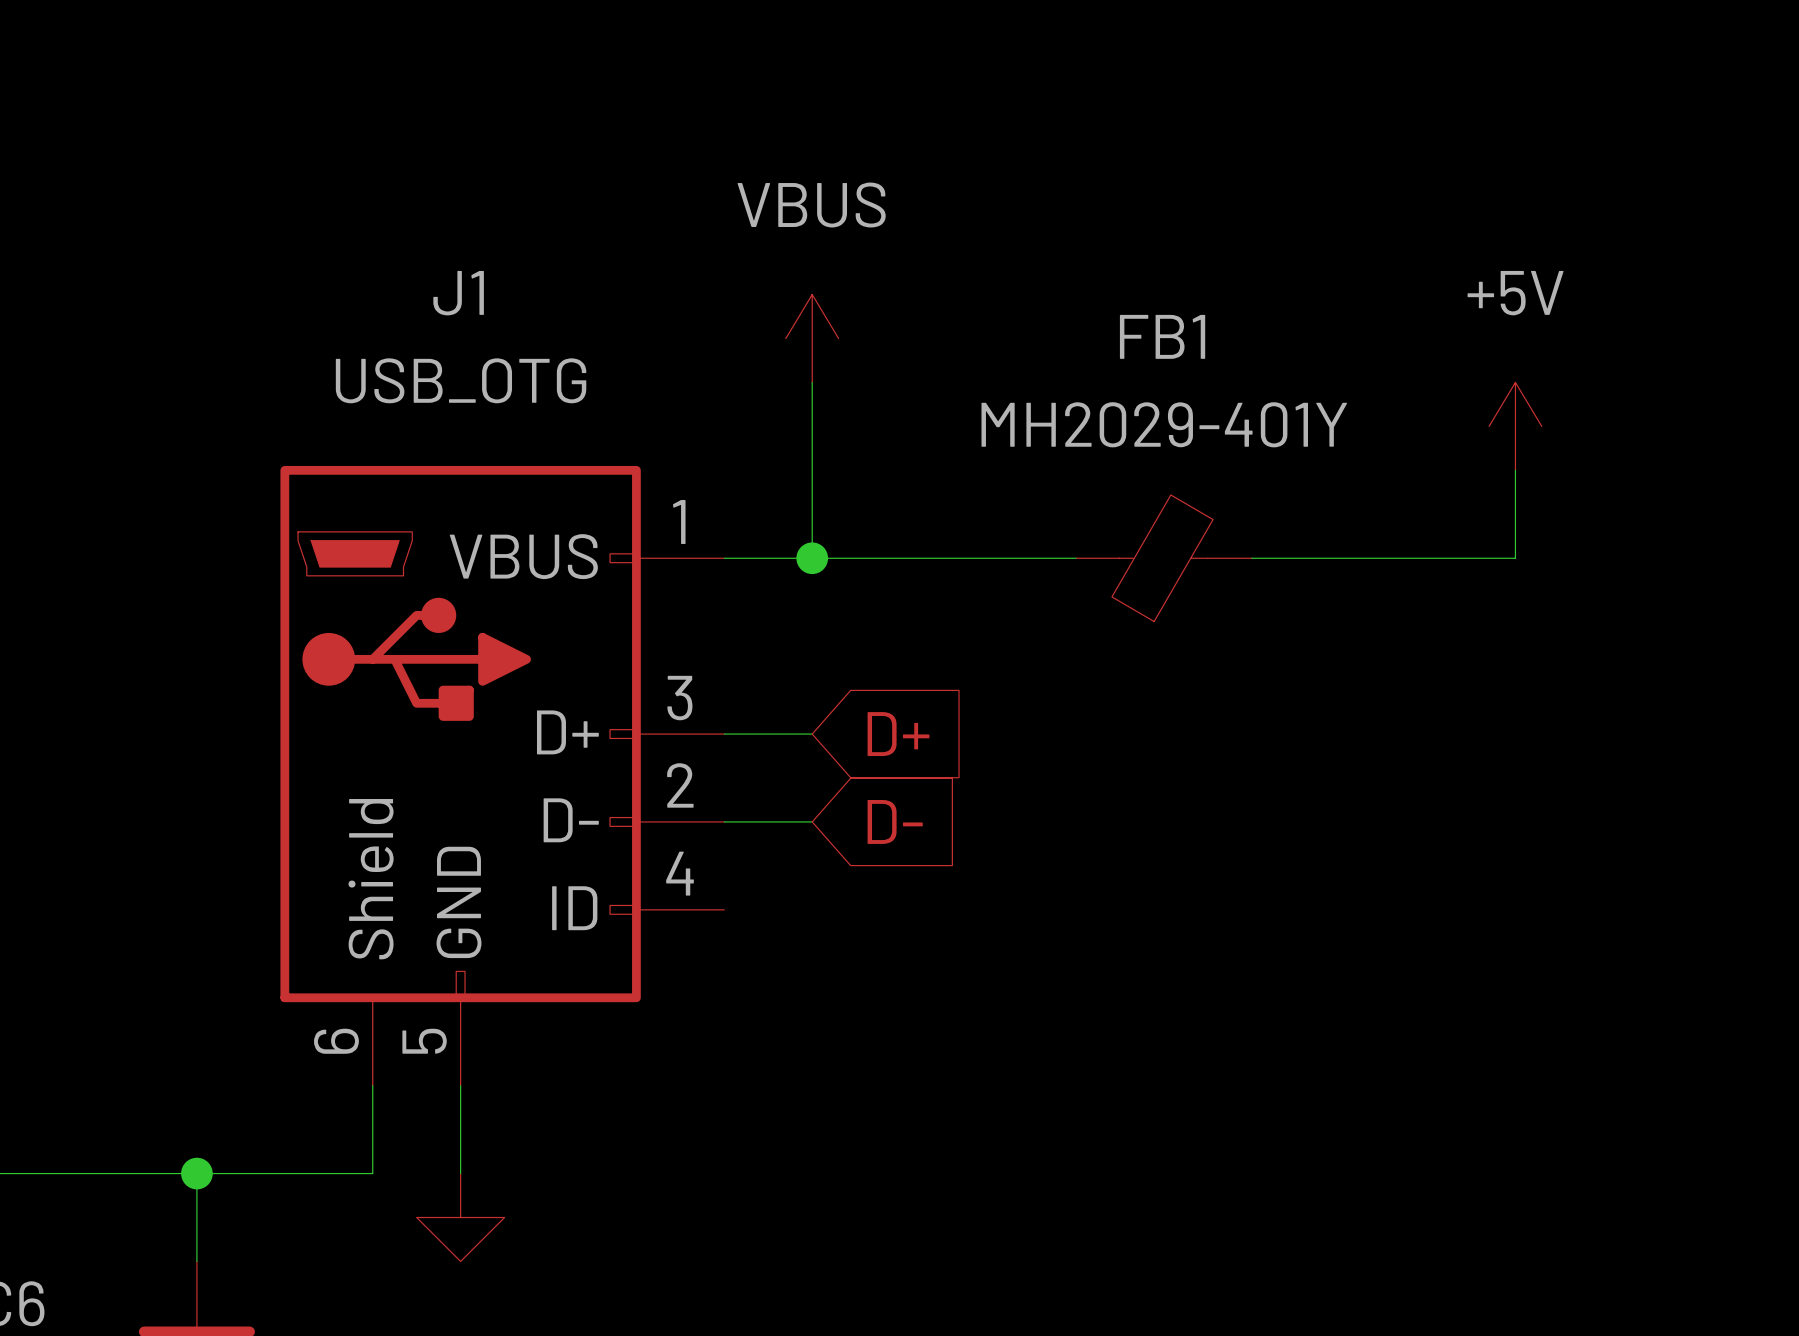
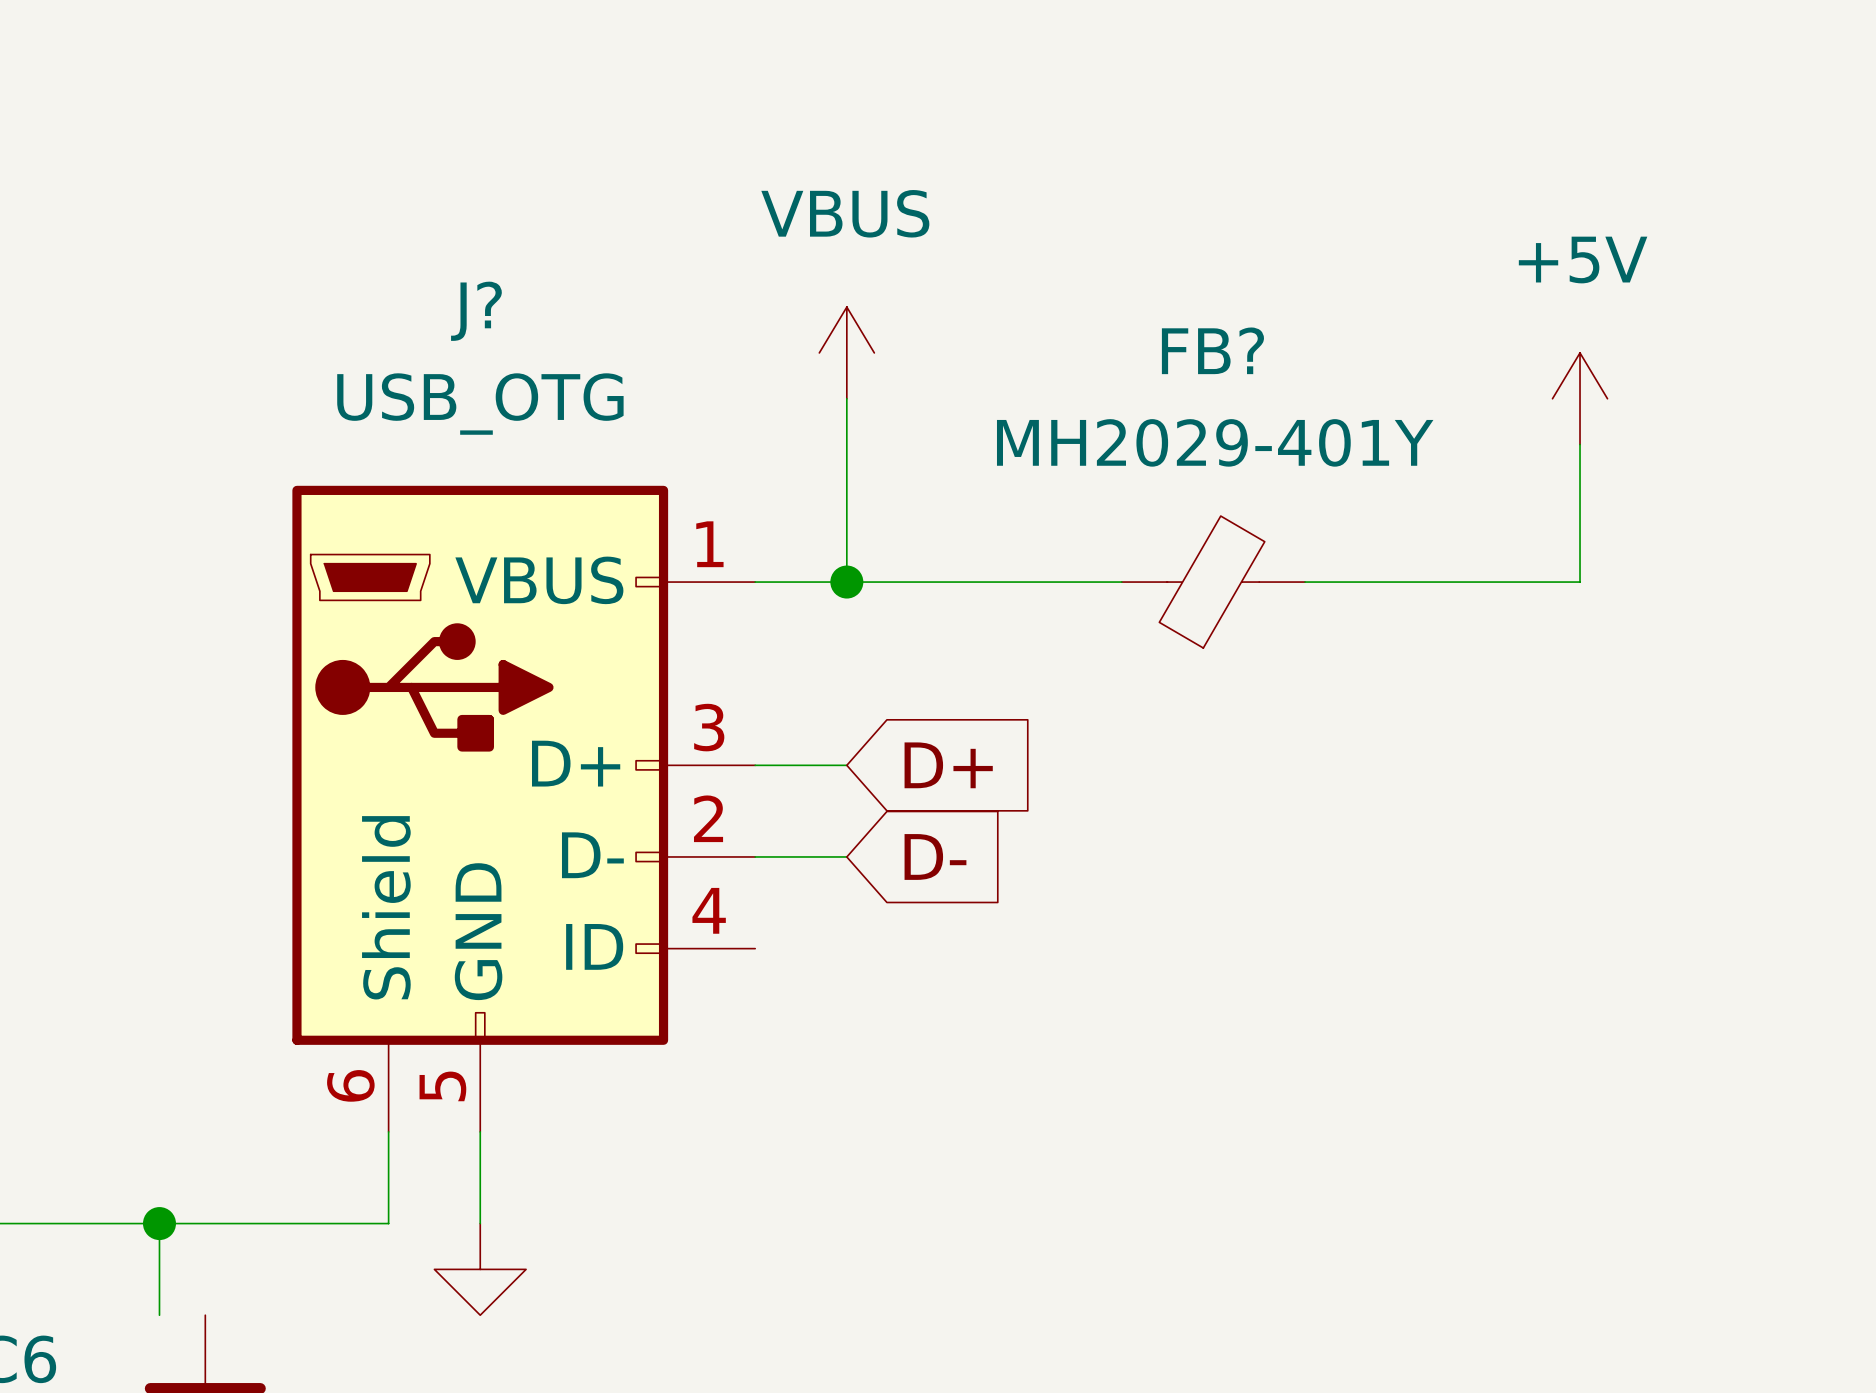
J1 name: J1 (458, 293) -> J? (476, 311)
FB1 name: FB1 (1162, 336) -> FB? (1212, 350)
power symbol position: +5V (1515, 426) -> +5V (1580, 398)
wire: (196, 1173) (196, 1261) -> (159, 1223) (159, 1315)
junction position: (196, 1173) -> (159, 1223)

